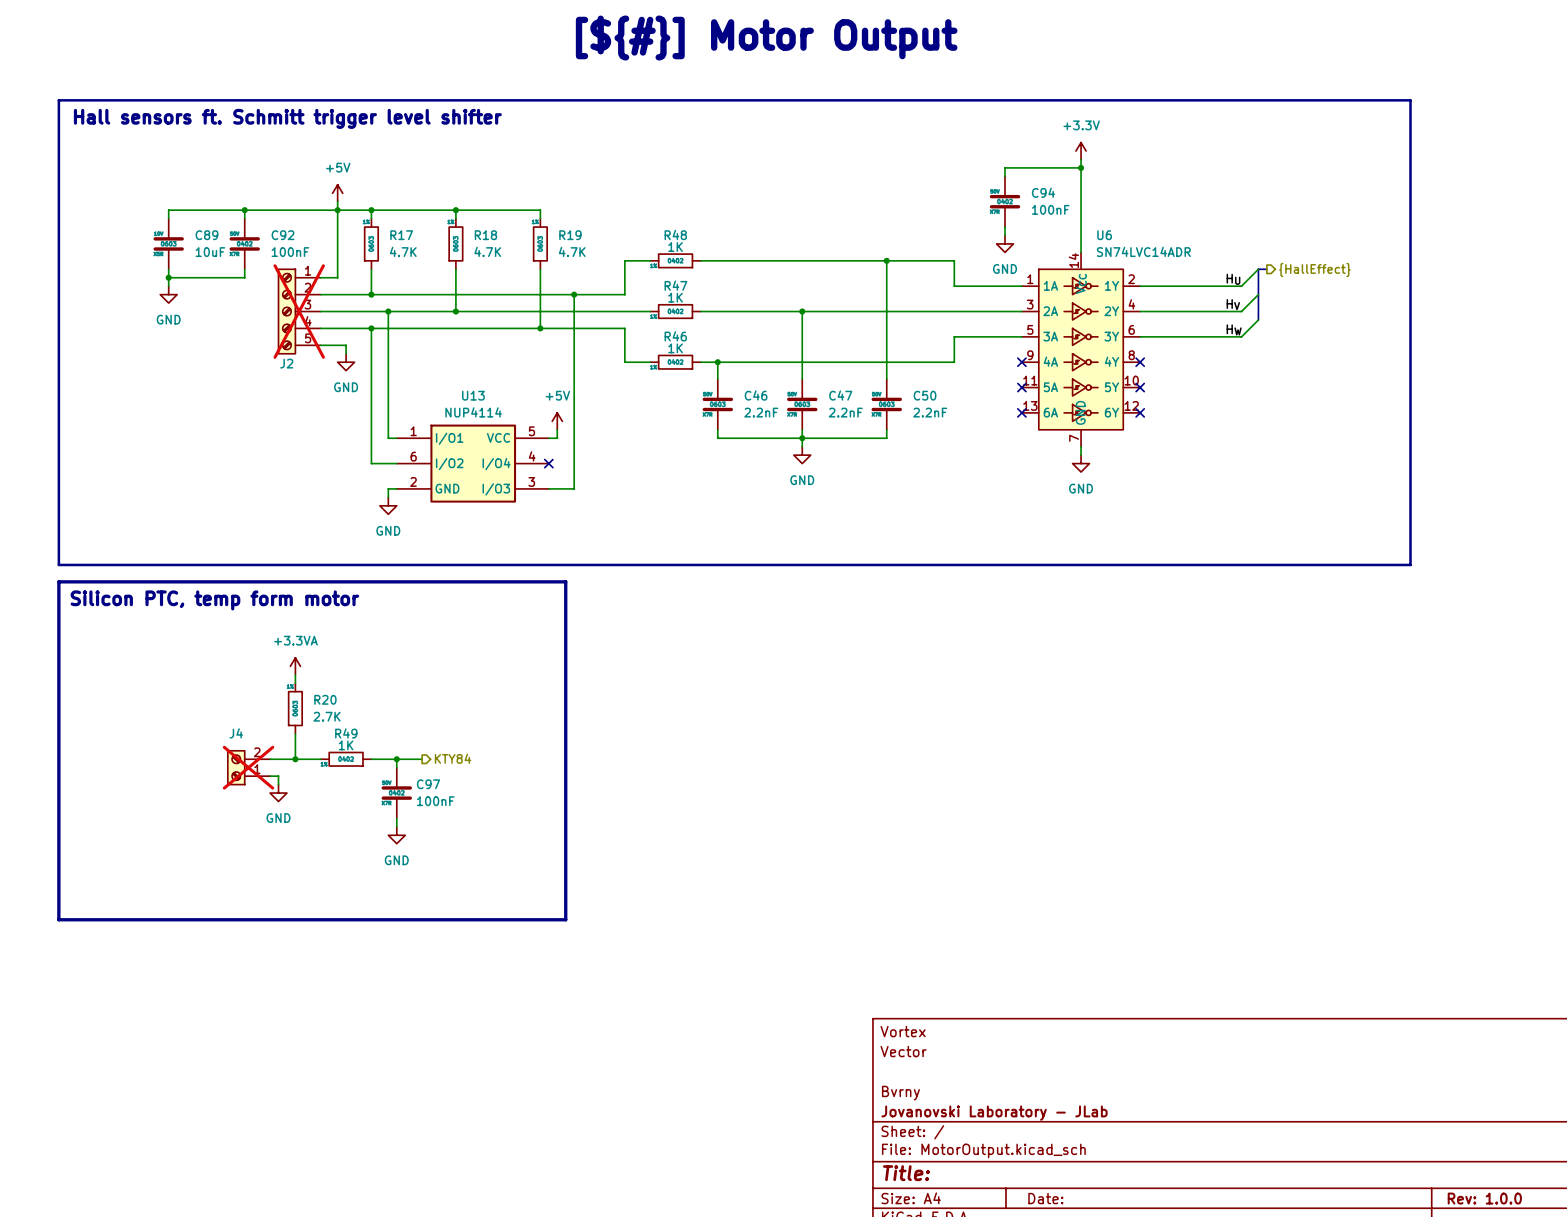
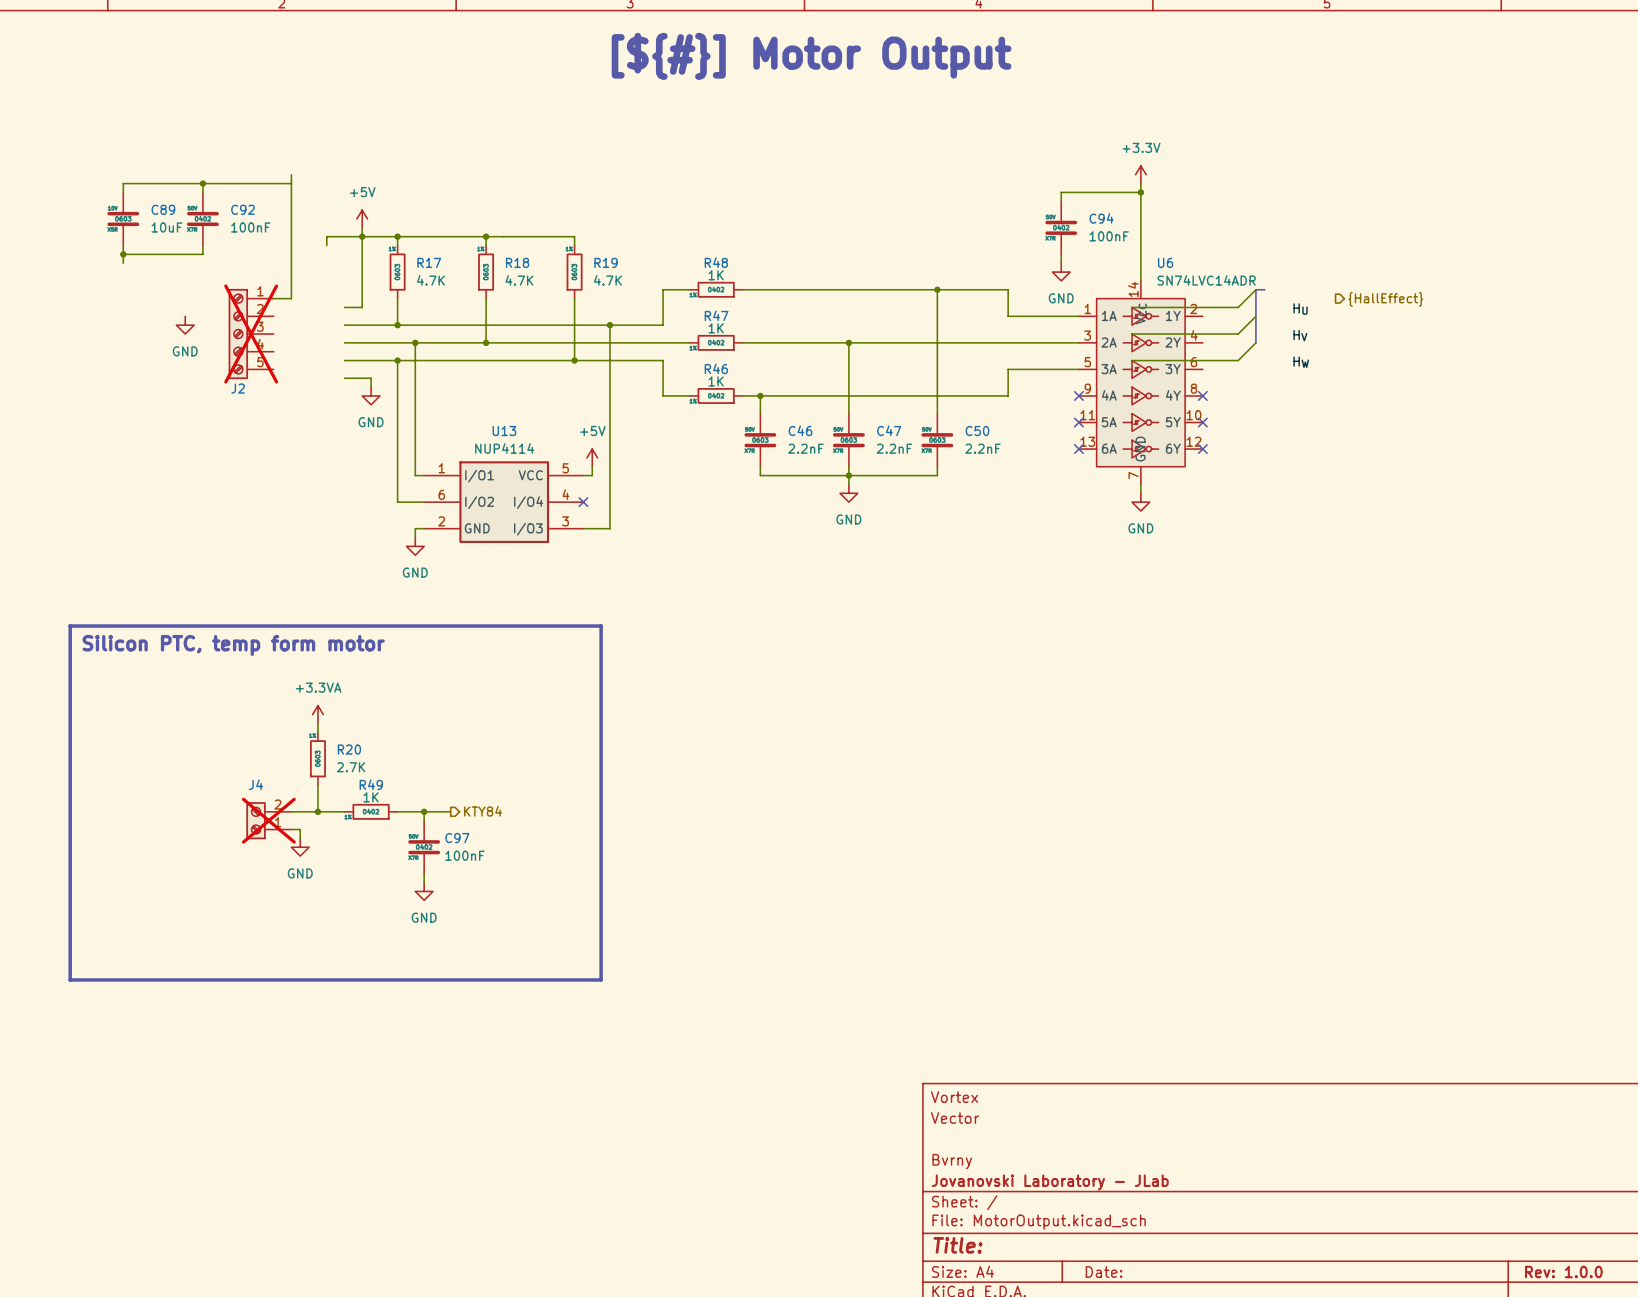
line: (58, 100) (1410, 100) (1410, 564) (58, 564) (58, 100) -> none
text: Hall sensors ft. Schmitt trigger level shifter (287, 118) -> none
wire: none -> (291, 174) (291, 298) (273, 298)
junction: none -> (202, 183)
wire: none -> (291, 183) (123, 183) (123, 192)
wire: (244, 210) (244, 218) -> (202, 183) (202, 192)
junction: (244, 210) -> none
wire: (303, 210) (168, 210) (168, 218) -> (326, 236) (326, 245)
junction: none -> (123, 254)
C89 position: (168, 243) -> (123, 218)
C92 position: (244, 243) -> (202, 218)
wire: (168, 269) (168, 286) -> (123, 245) (123, 263)
wire: (244, 269) (244, 277) (168, 277) -> (202, 245) (202, 254) (123, 254)
wire: (1258, 269) (1241, 286) (1140, 286) -> (1255, 289) (1238, 307) (1132, 307)
bus: (1266, 269) (1258, 269) (1258, 319) -> (1264, 289) (1255, 289) (1255, 342)
junction: (168, 277) -> none
wire: (1258, 294) (1241, 311) (1140, 311) -> (1255, 316) (1238, 334) (1132, 334)
J2 position: (299, 311) -> (251, 334)
wire: (1258, 319) (1241, 336) (1140, 336) -> (1255, 342) (1238, 360) (1132, 360)

